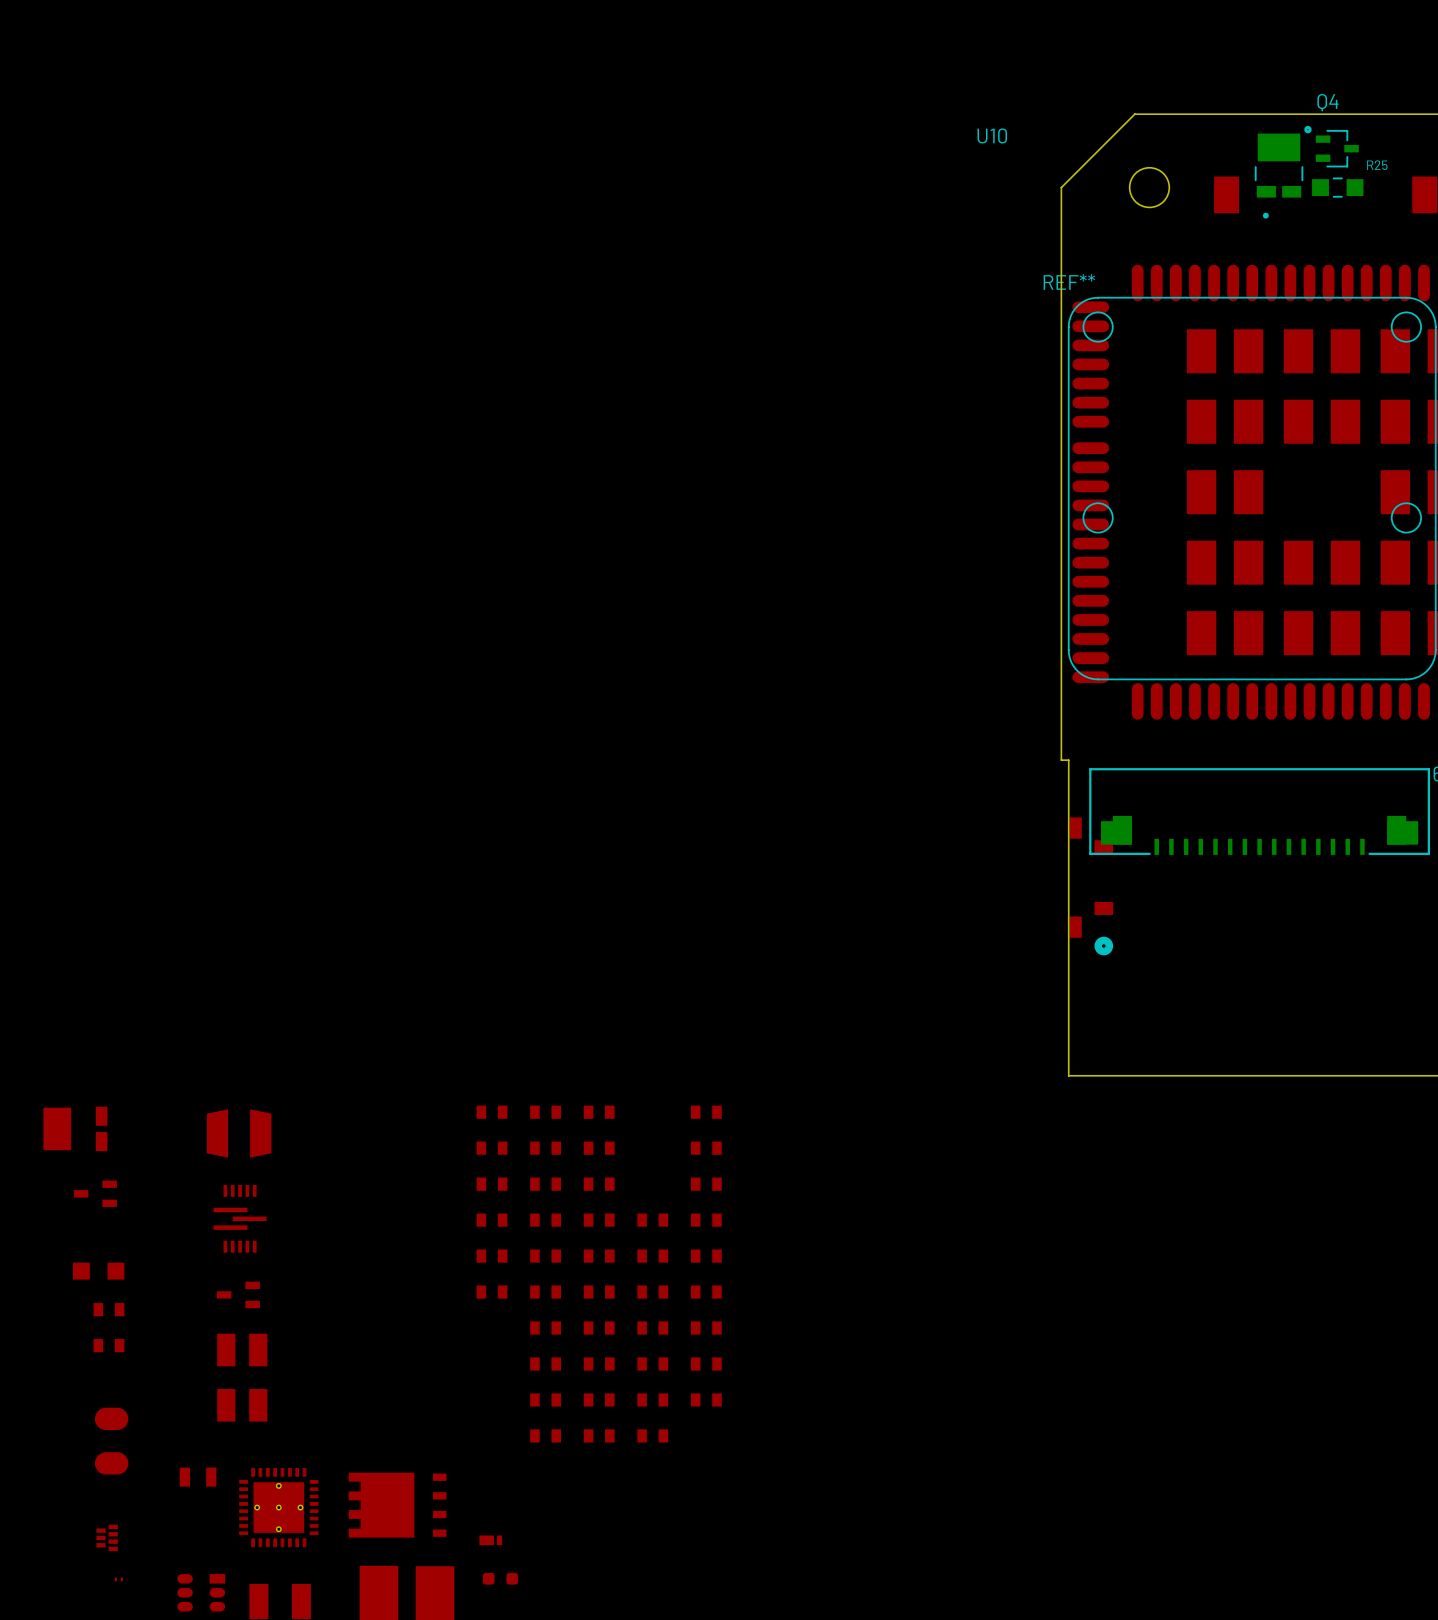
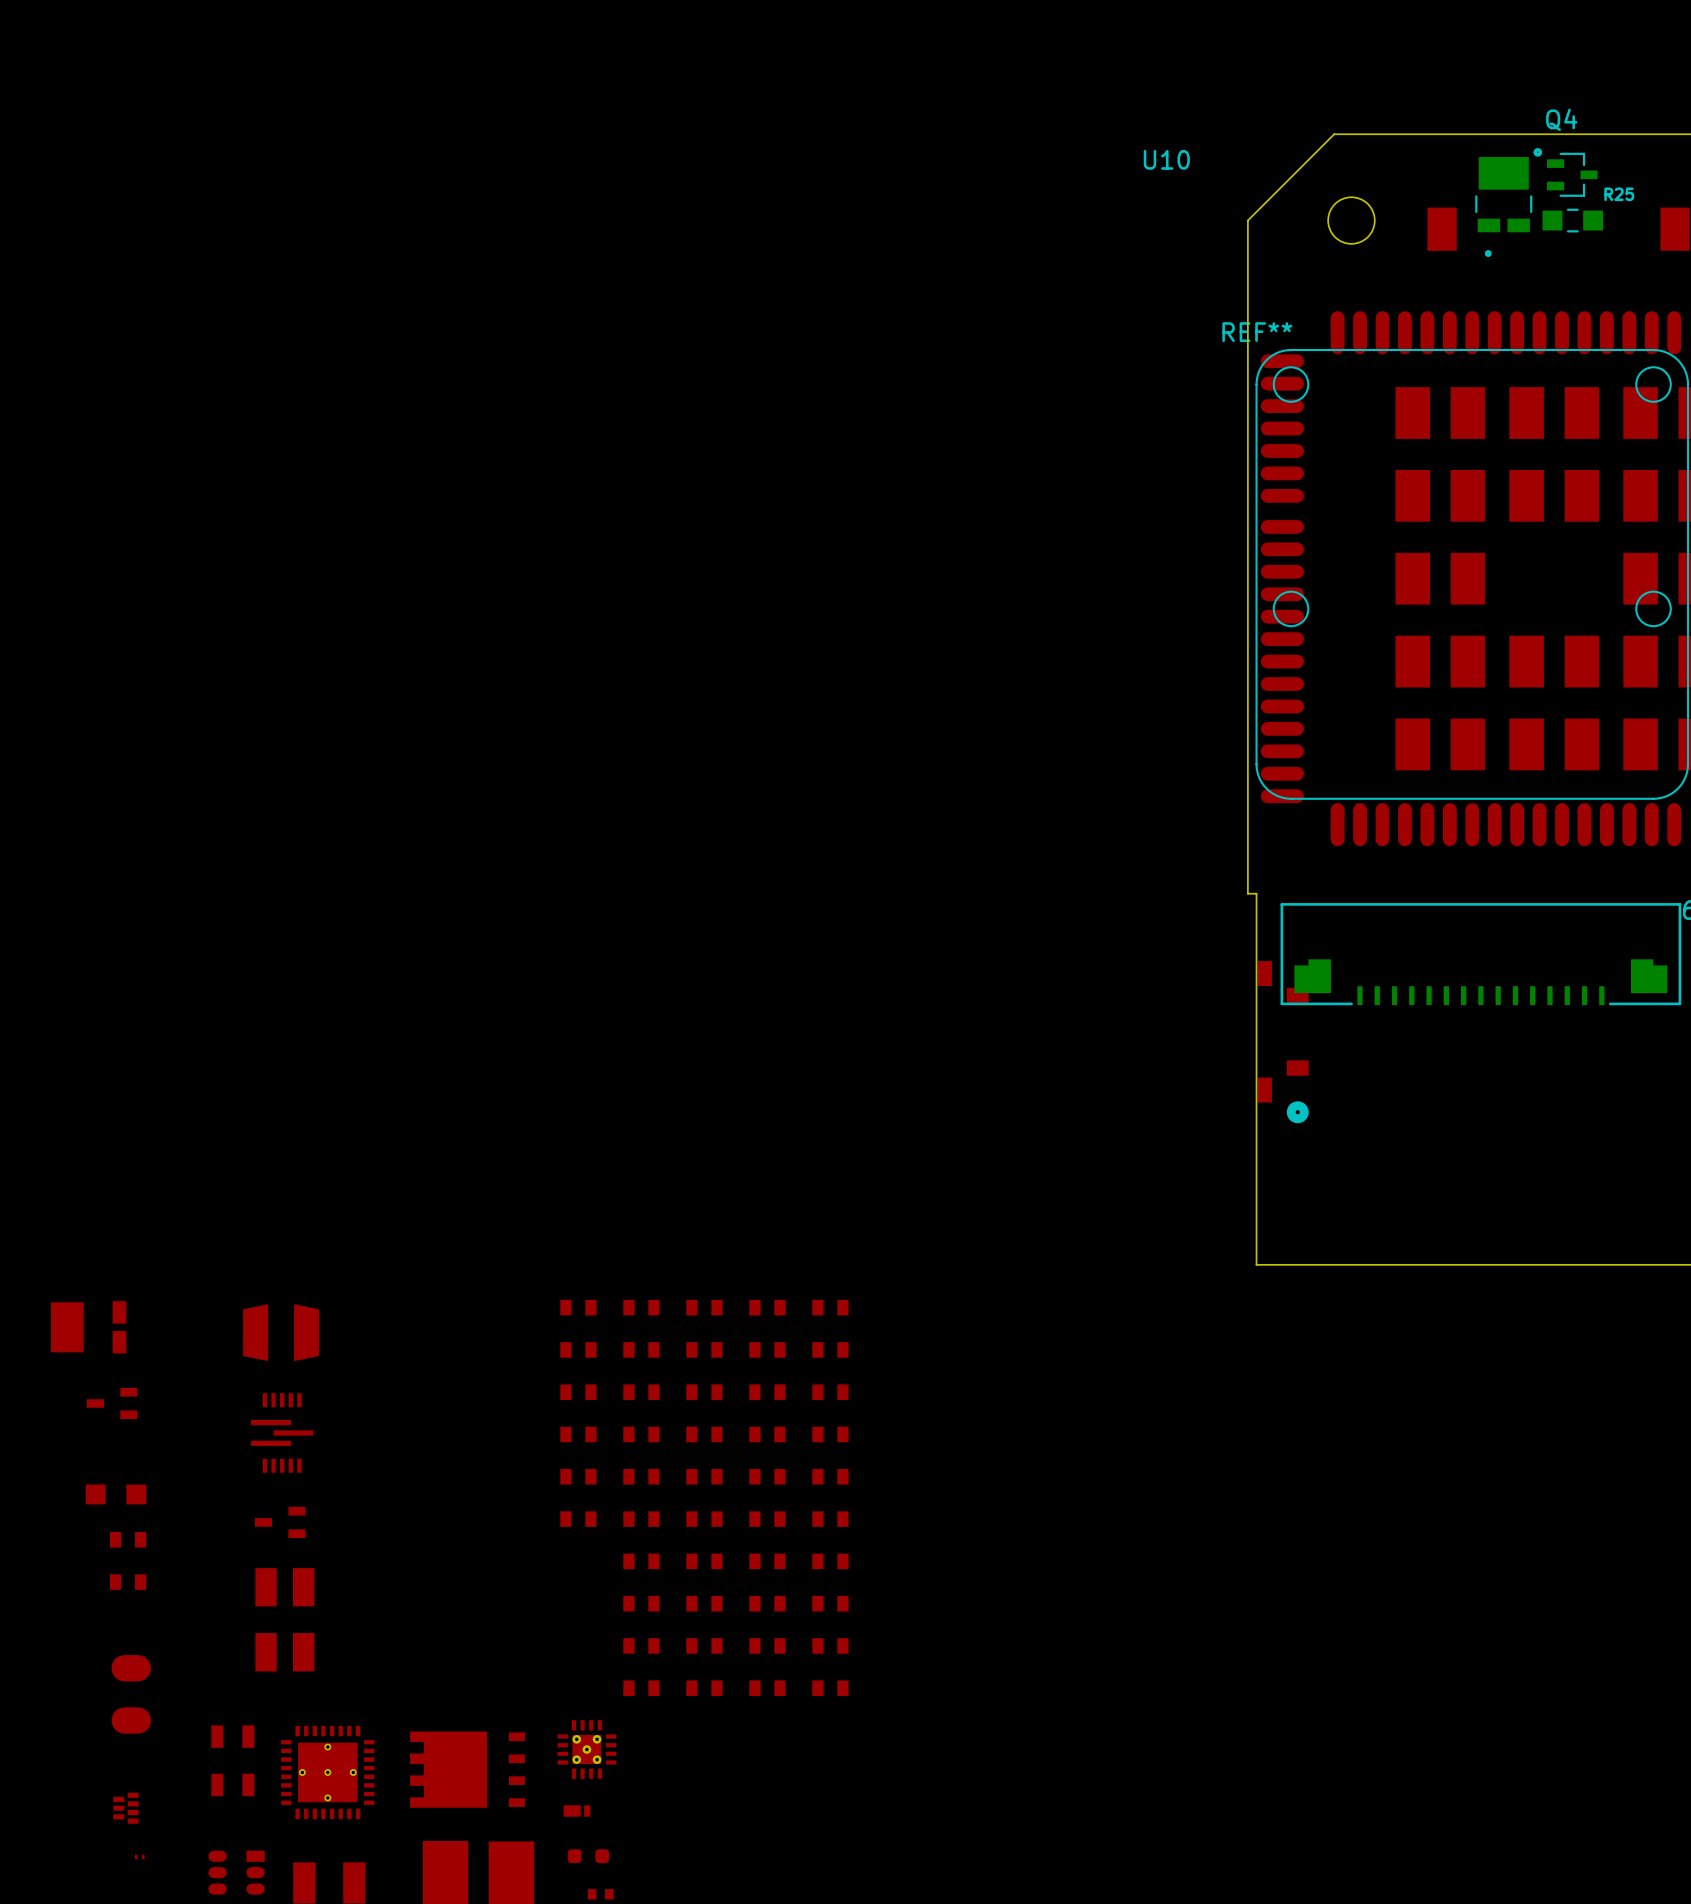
part: none -> (767, 1307)
part: none -> (767, 1349)
part: none -> (767, 1392)
part: none -> (830, 1688)
part: none -> (586, 1749)
part: none -> (232, 1784)
part: none -> (600, 1894)

